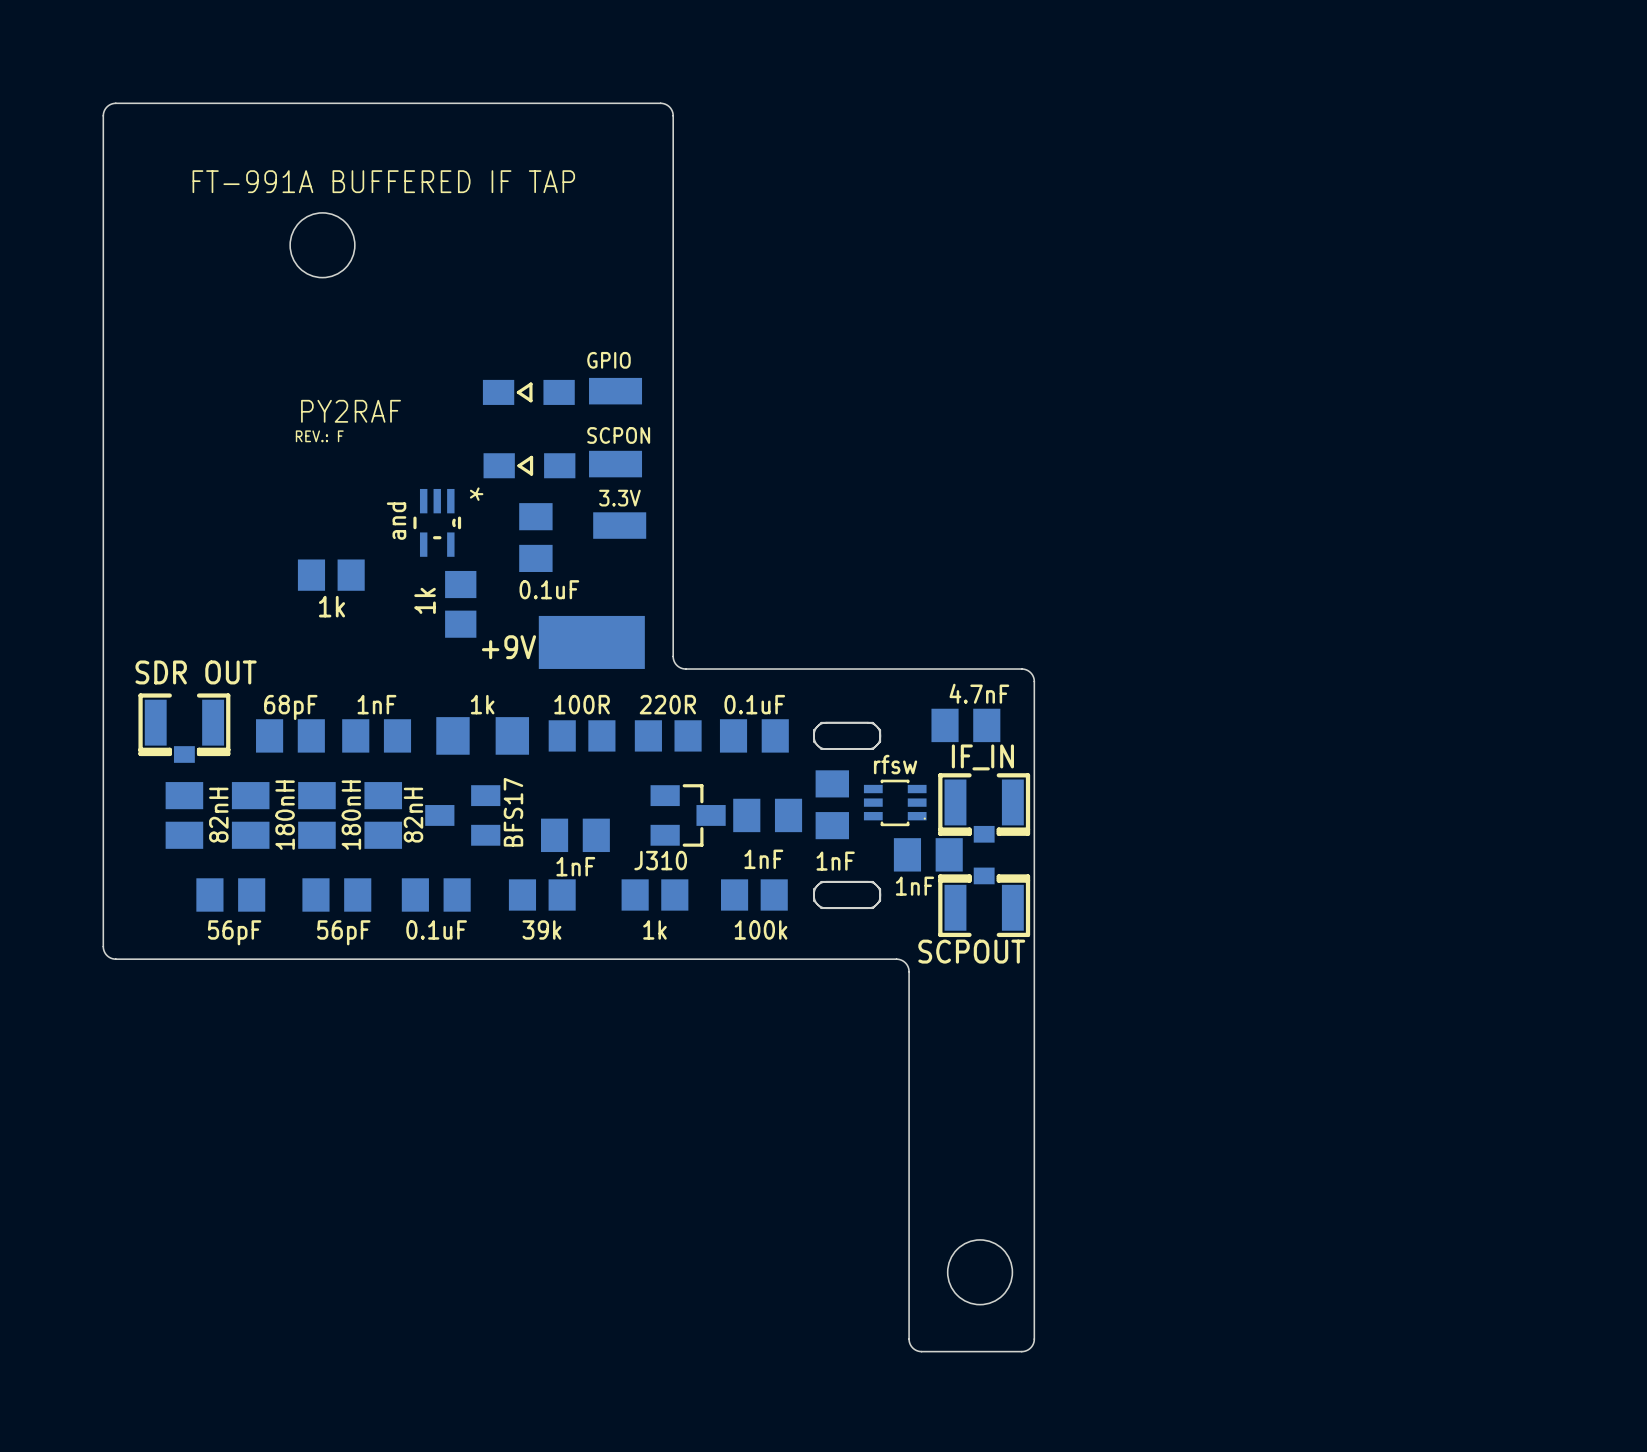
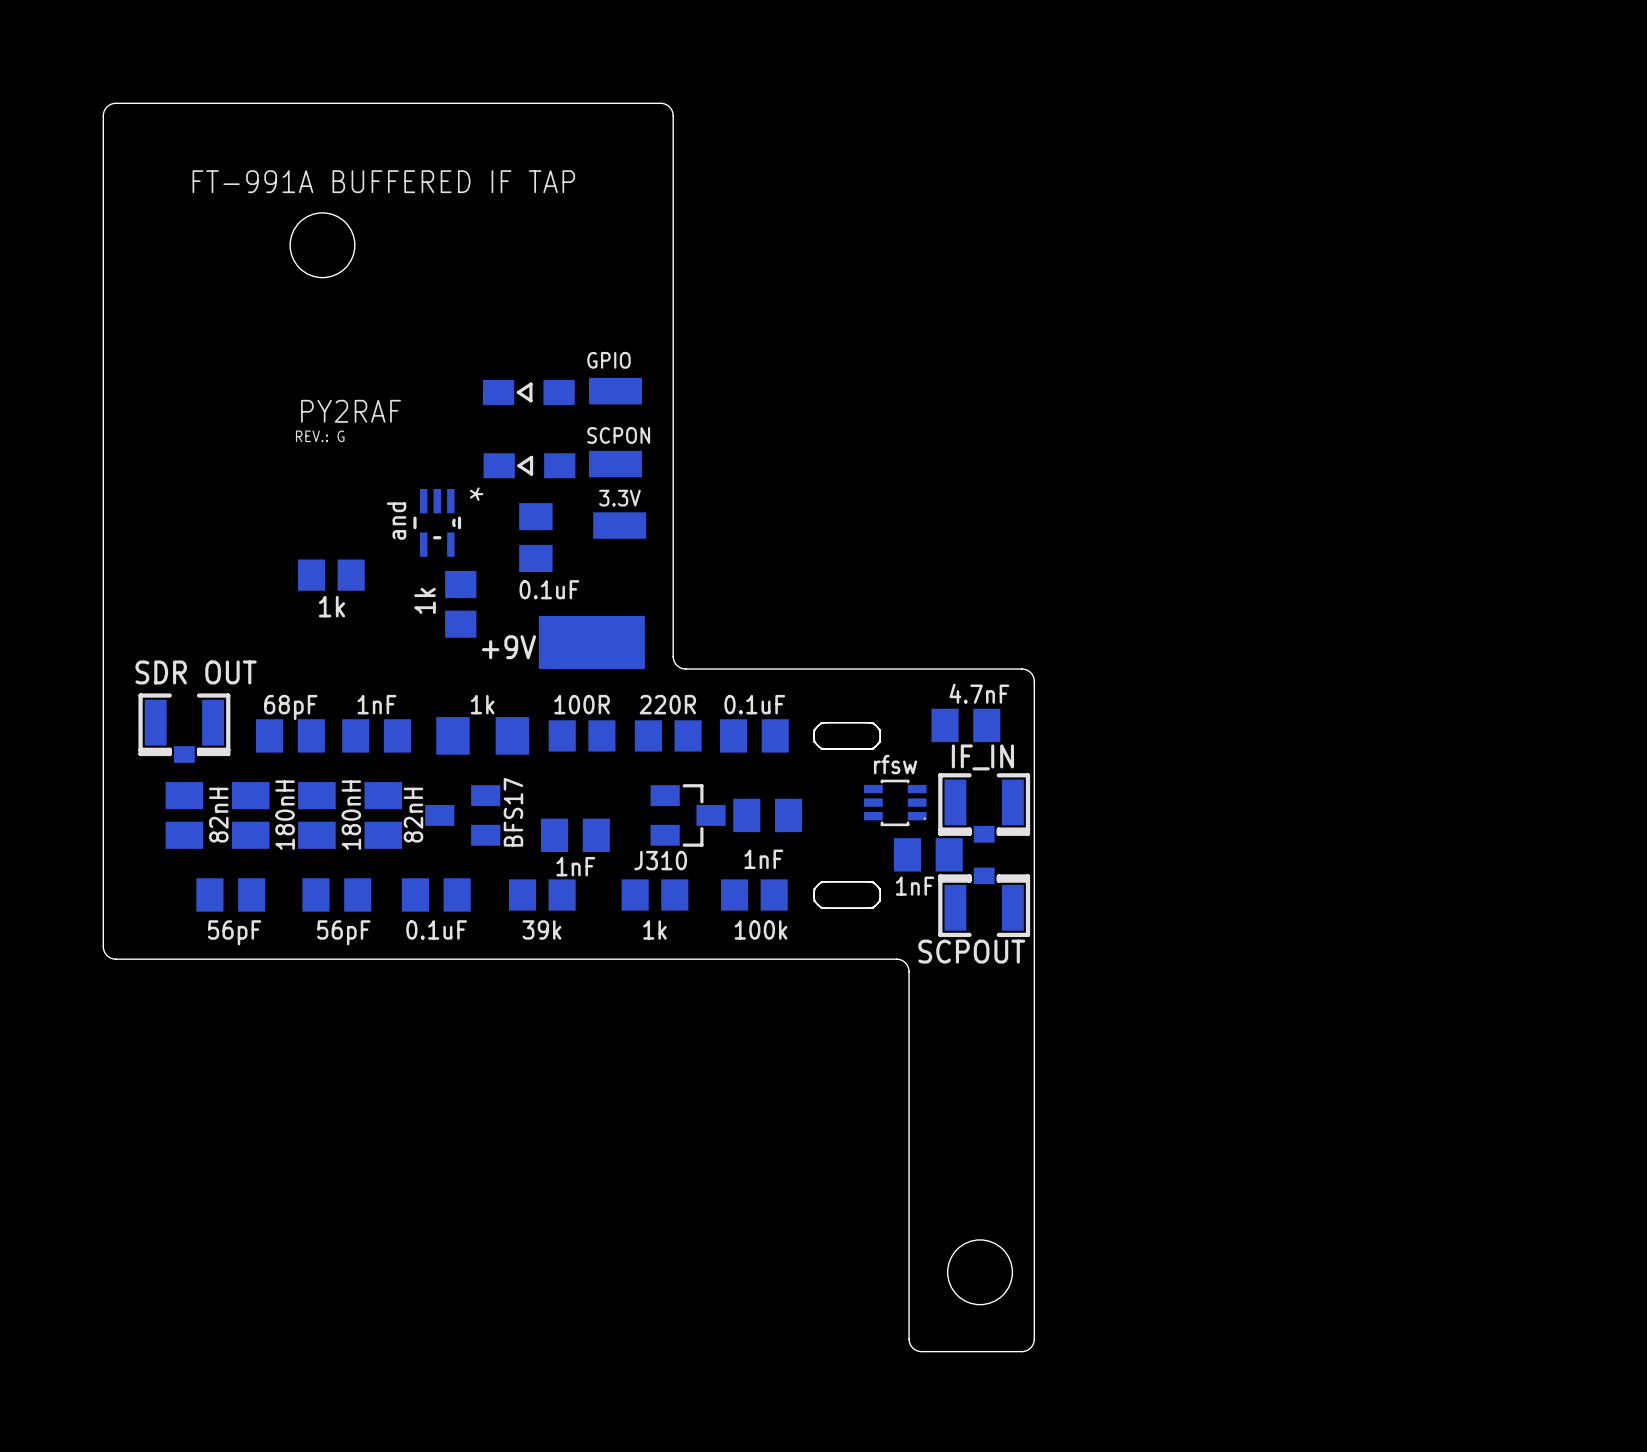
text: REV.: F (319, 436) -> REV.: G (320, 436)
part: 1nF (832, 804) -> none

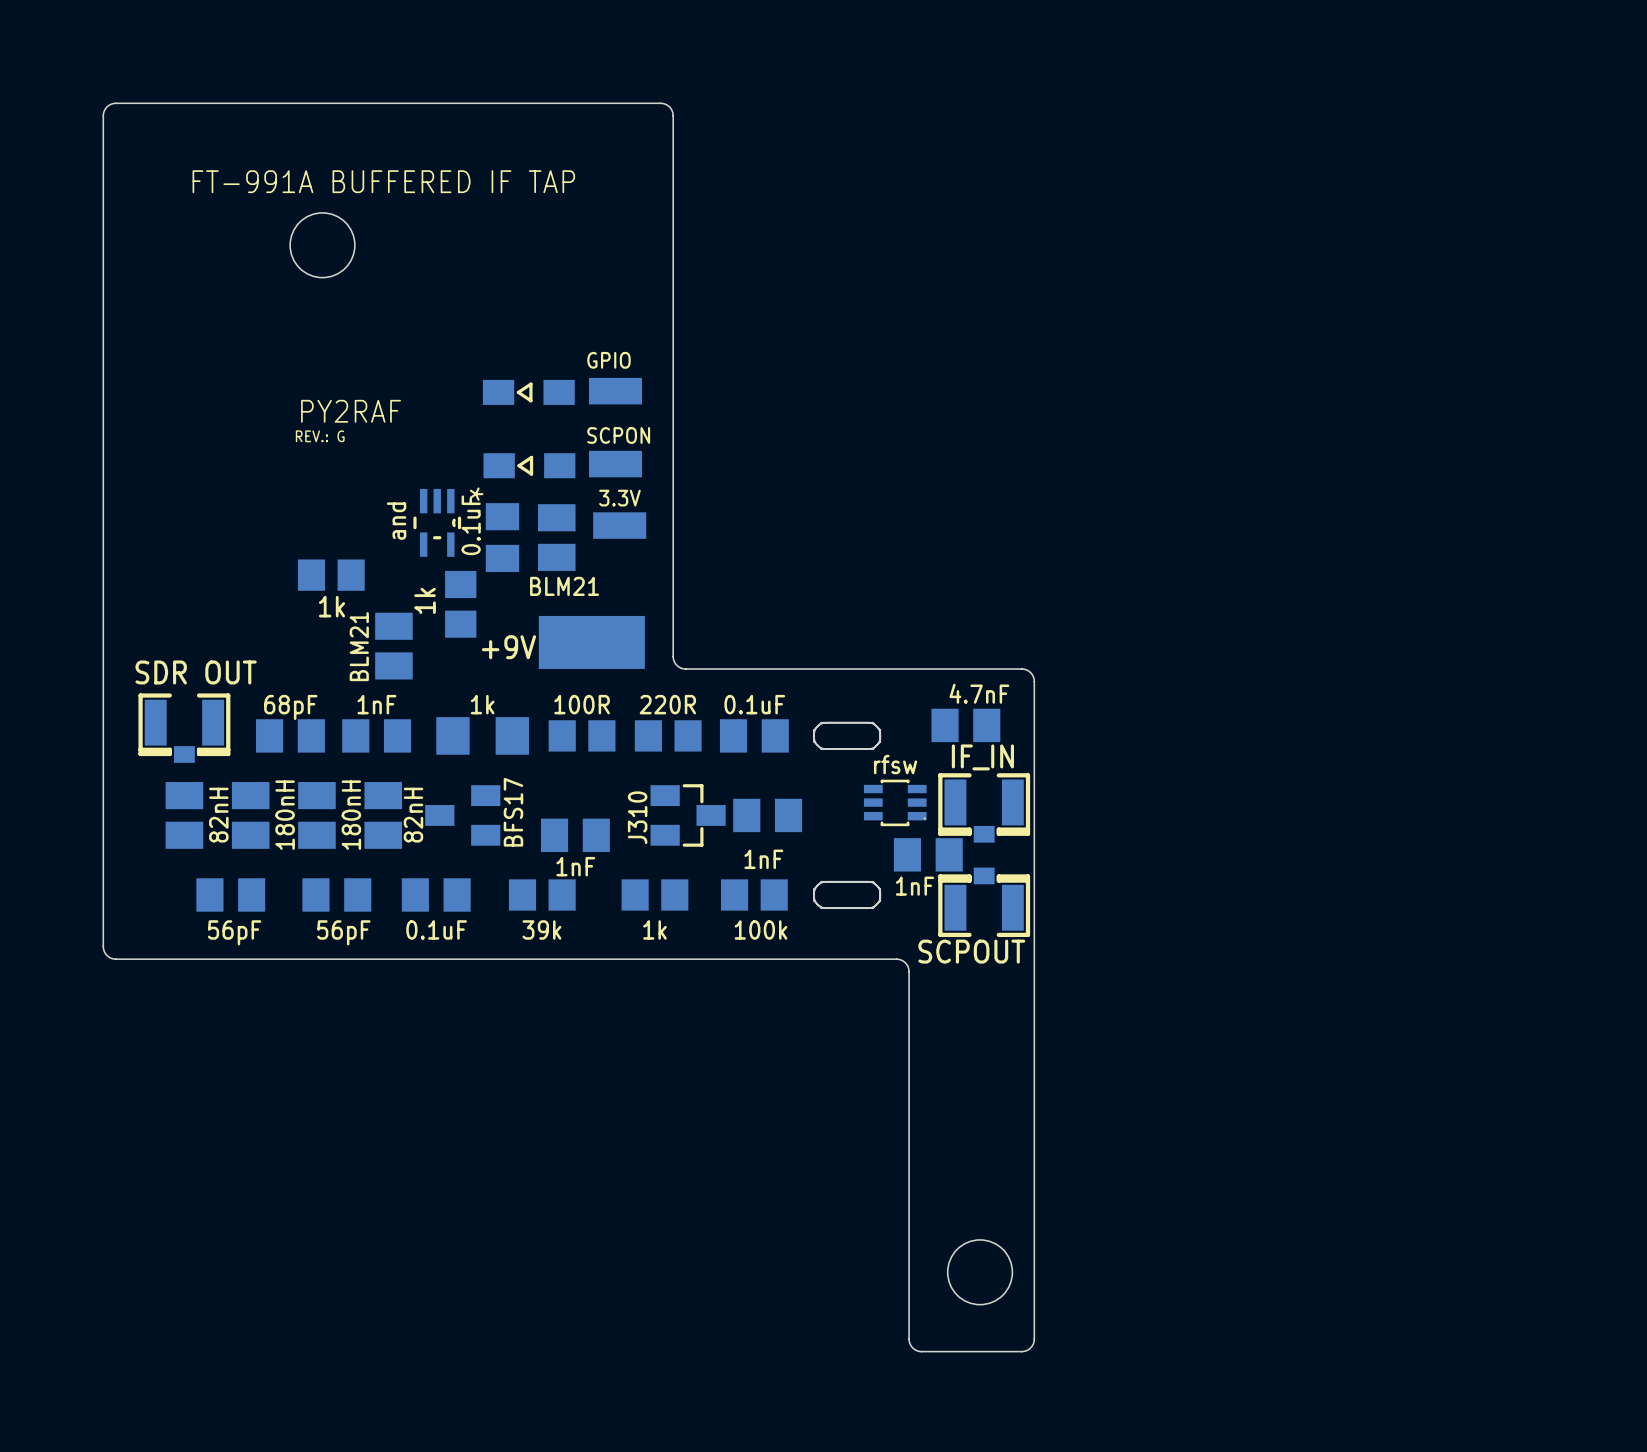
part position: (535, 537) -> (502, 537)
part: none -> BLM21 (556, 537)
part value rotation: 0° (549, 589) -> 90° counterclockwise (471, 525)
part value position: 0.1uF (549, 589) -> 0.1uF (471, 525)
part: none -> BLM21 (393, 646)
text rotation: 0° (660, 860) -> 90° counterclockwise (637, 817)

